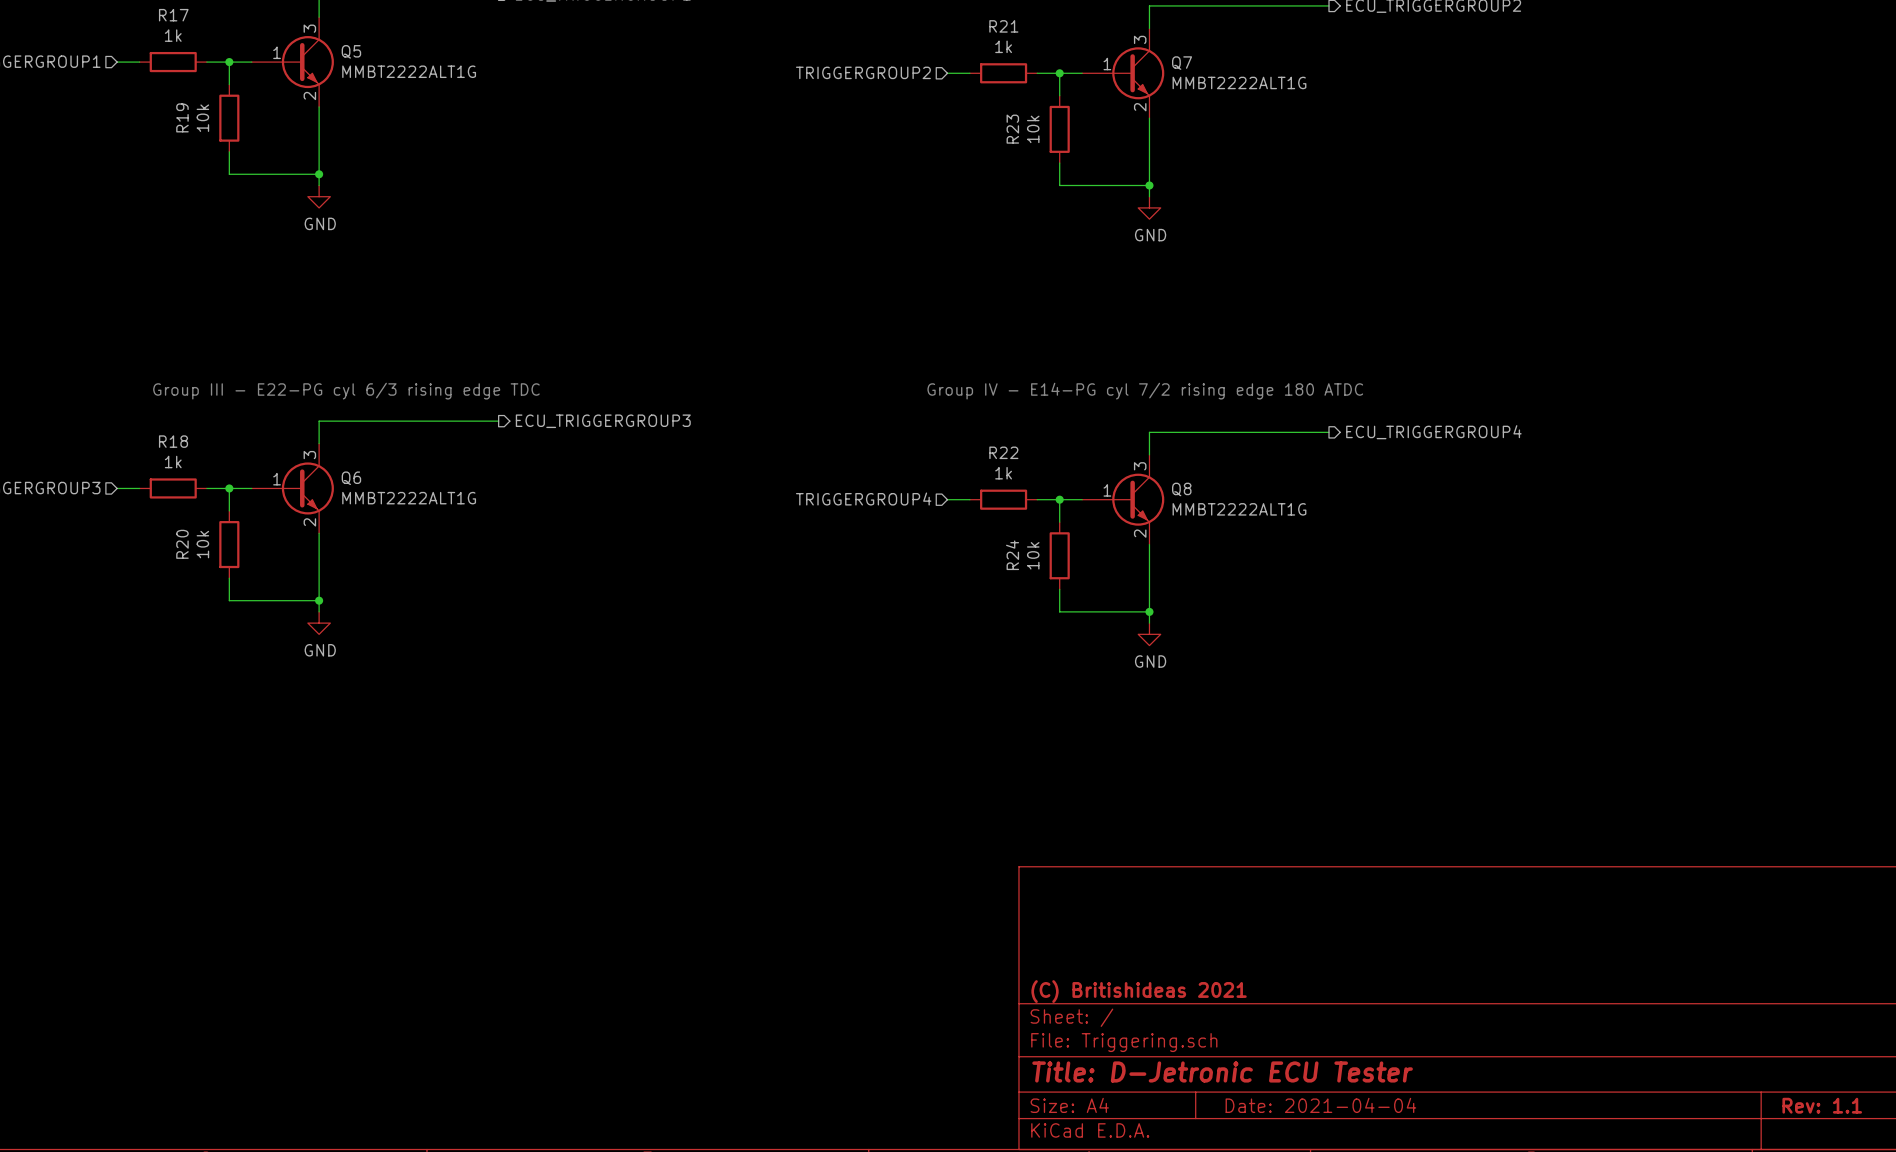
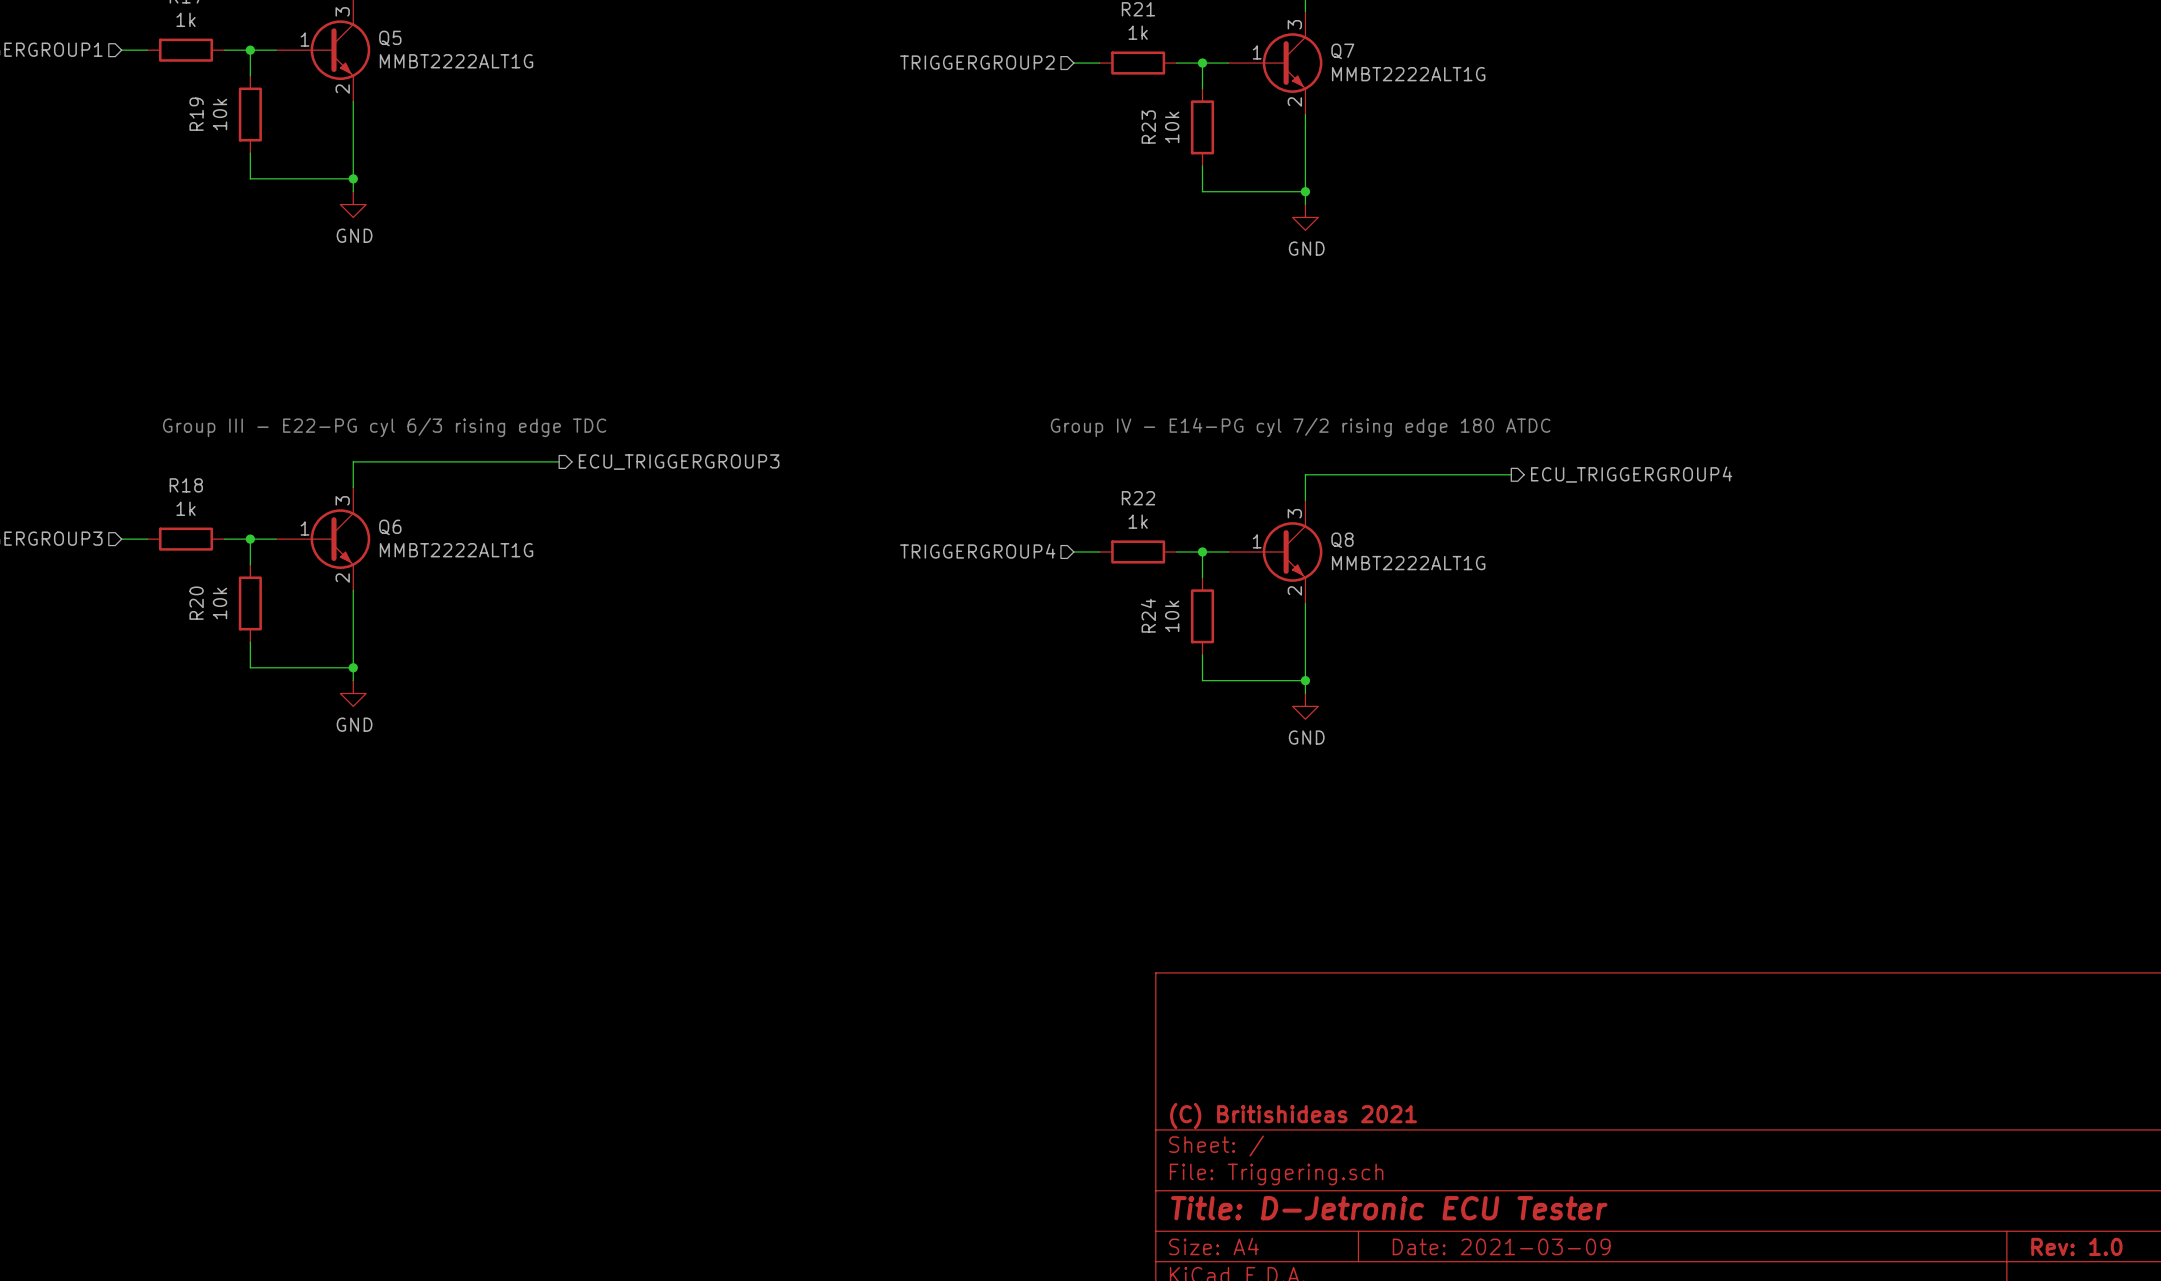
title block: Date: 2021-04-04 (1320, 1105) -> Date: 2021-03-09 (1501, 1246)
title block: Rev: 1.1 (1822, 1105) -> Rev: 1.0 (2076, 1246)

